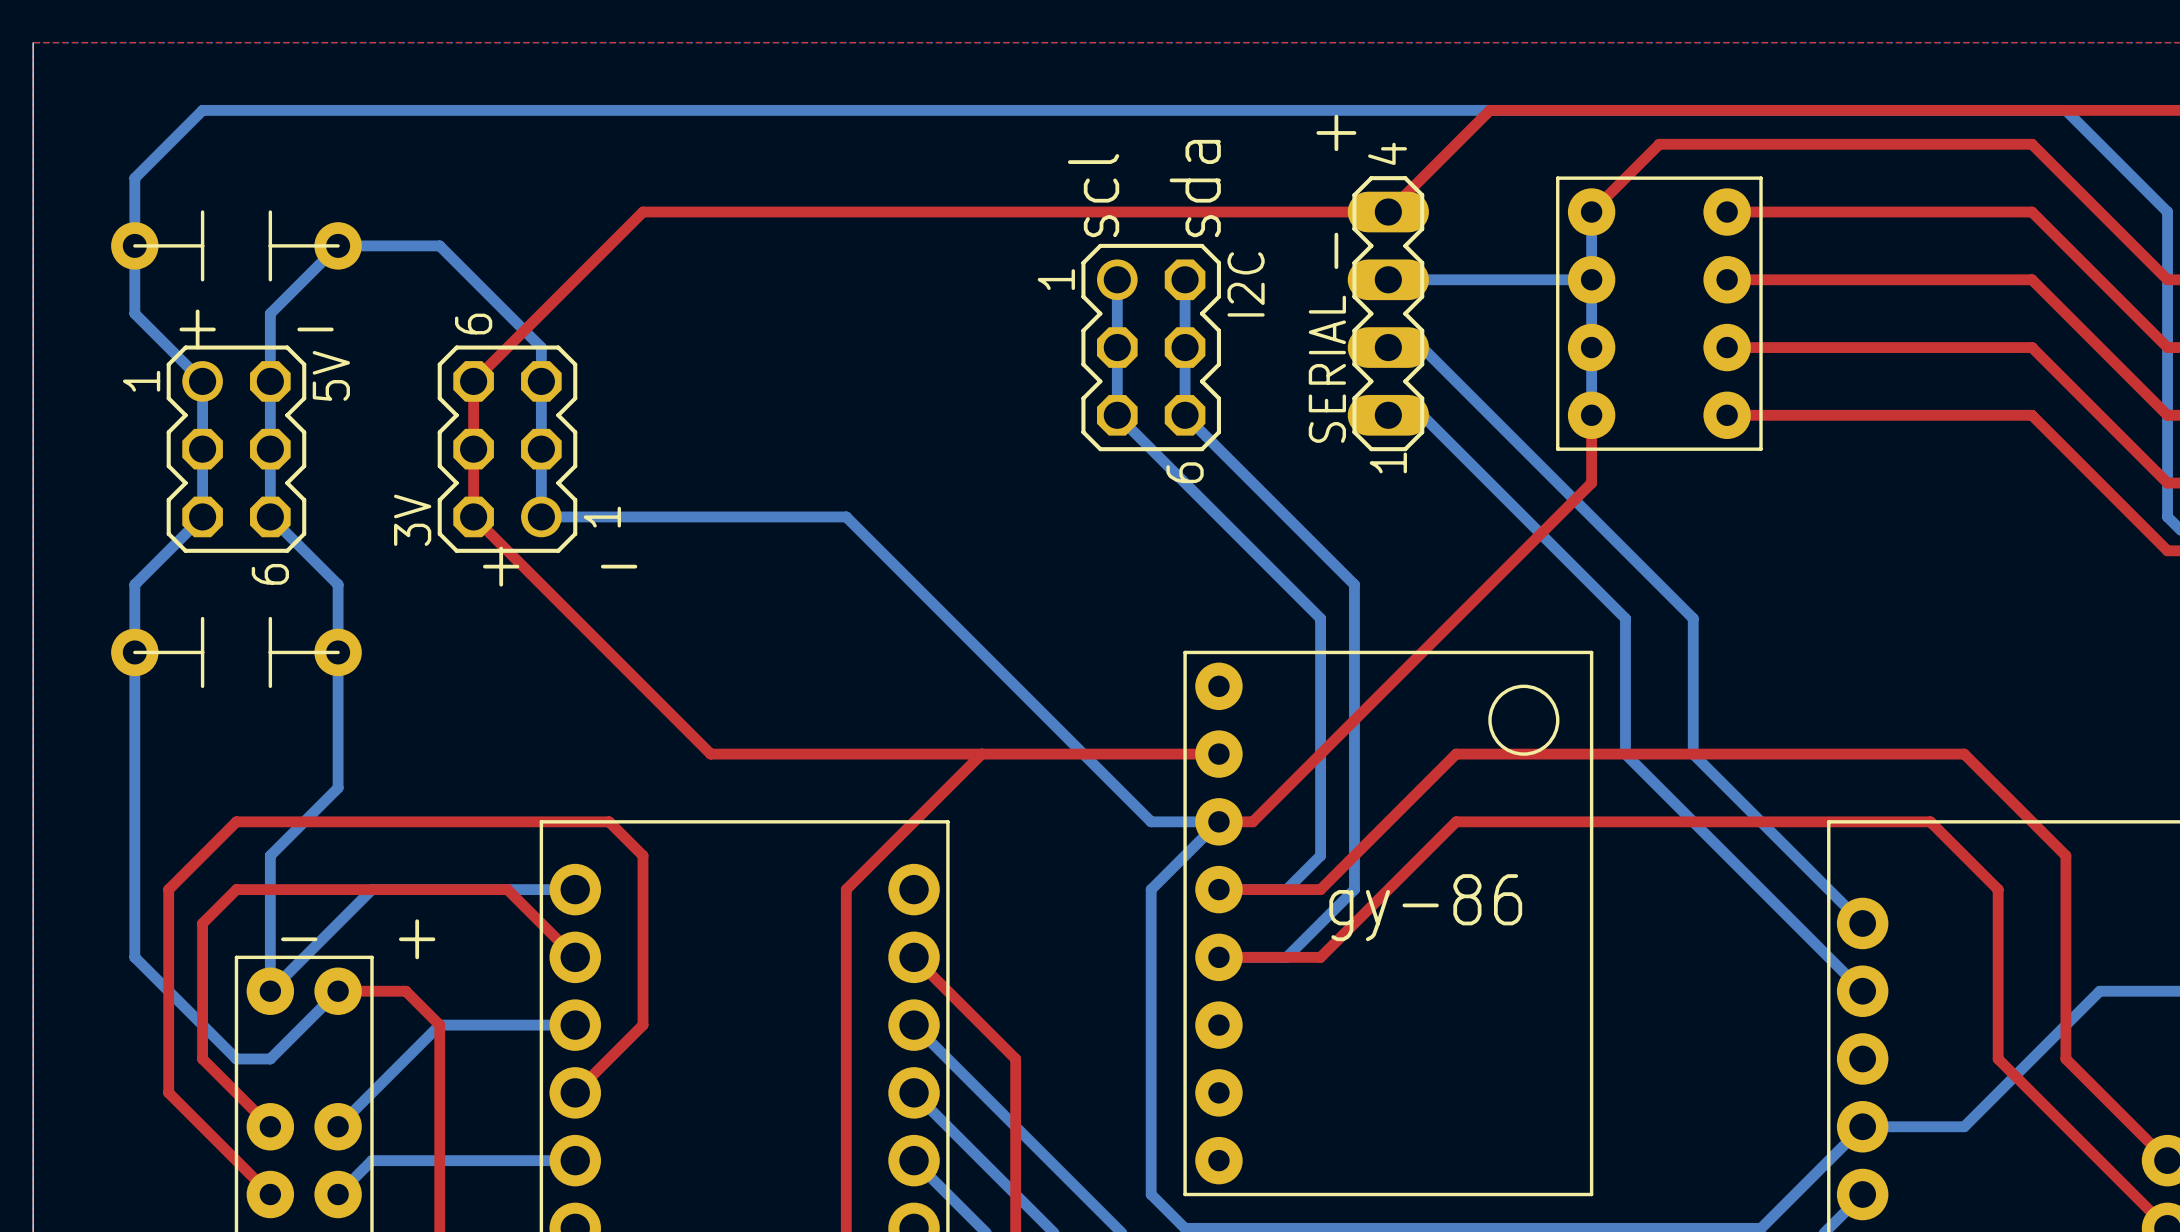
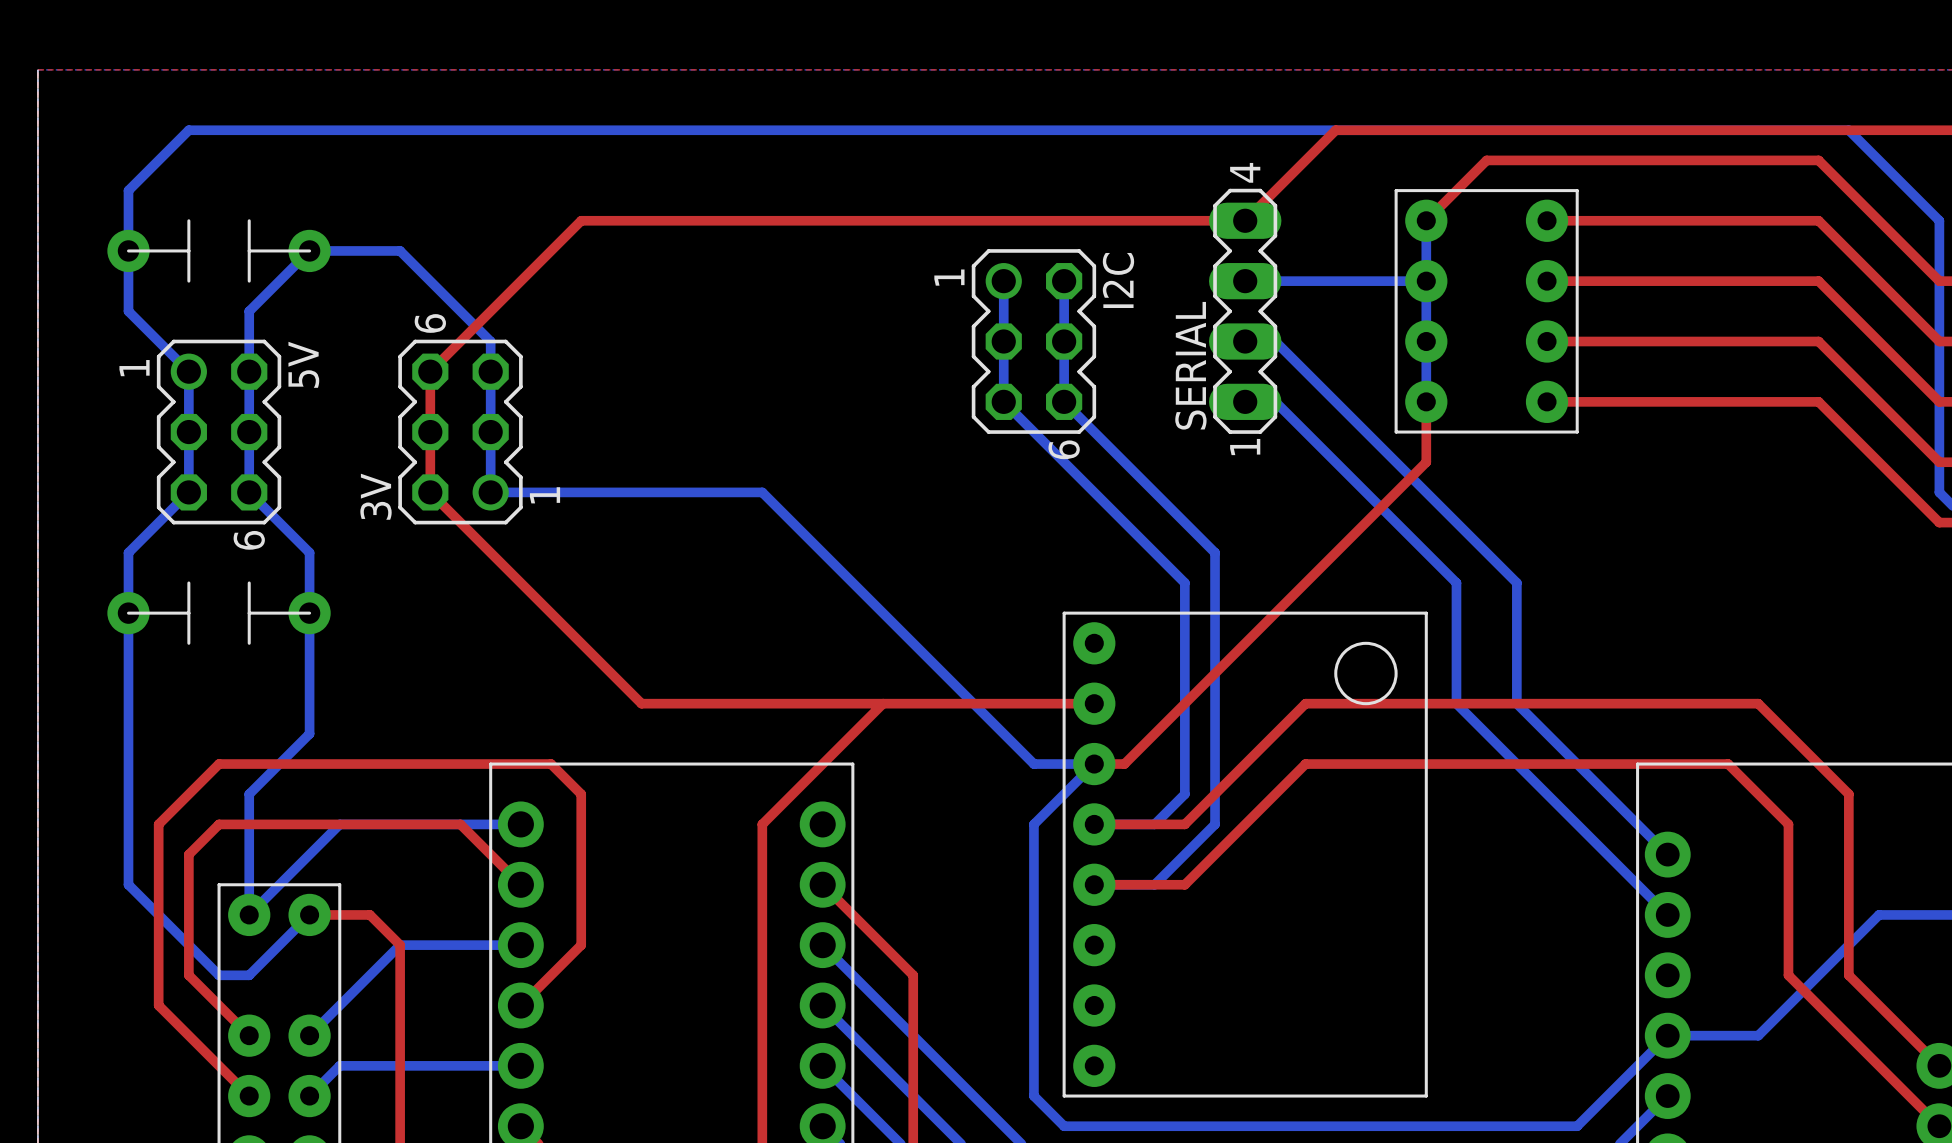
text: sda (1195, 188) -> none
text: - + (1336, 191) -> none
text: scl (1093, 195) -> none
text: + - (256, 329) -> none
text: + - (560, 566) -> none
text: gy-86 (1425, 907) -> none
text: - + (358, 939) -> none

